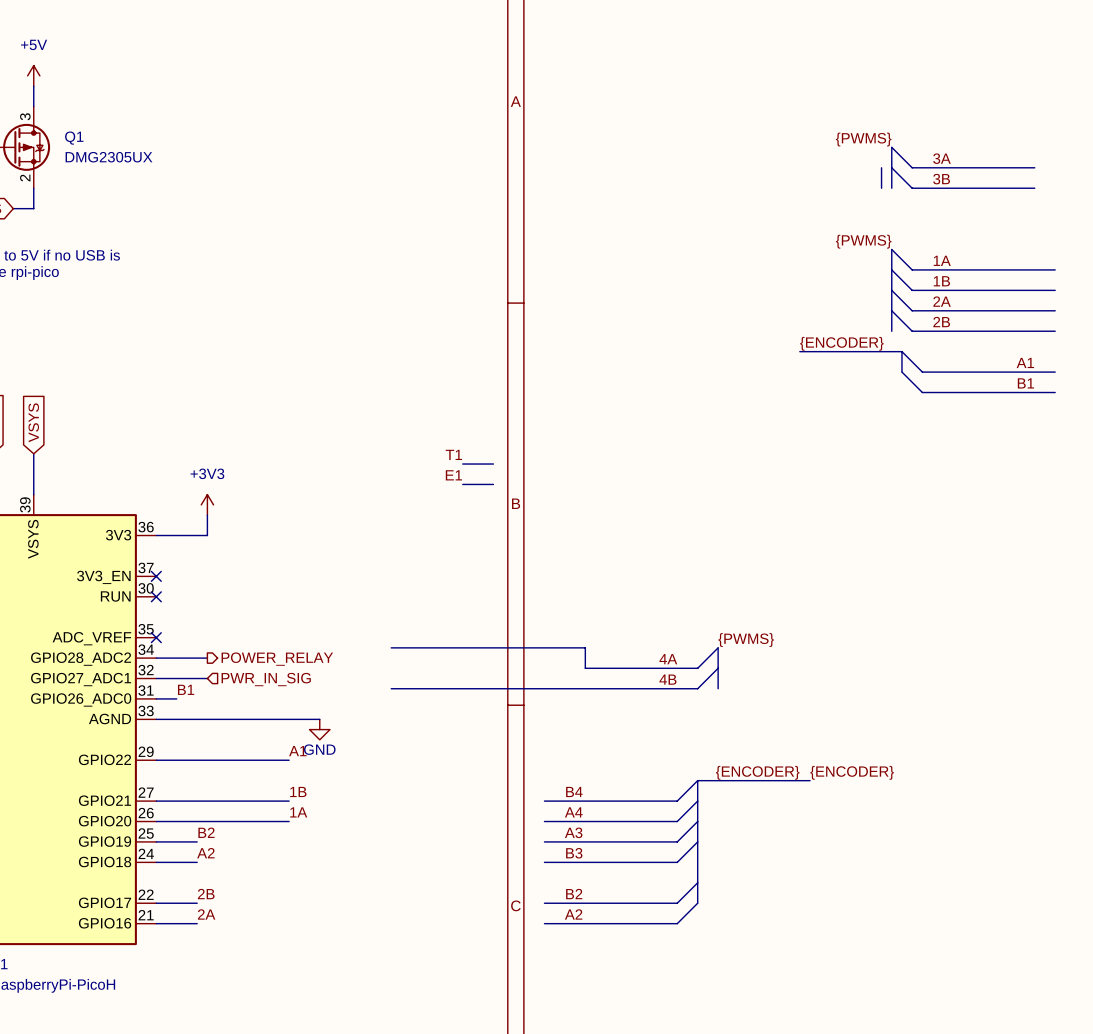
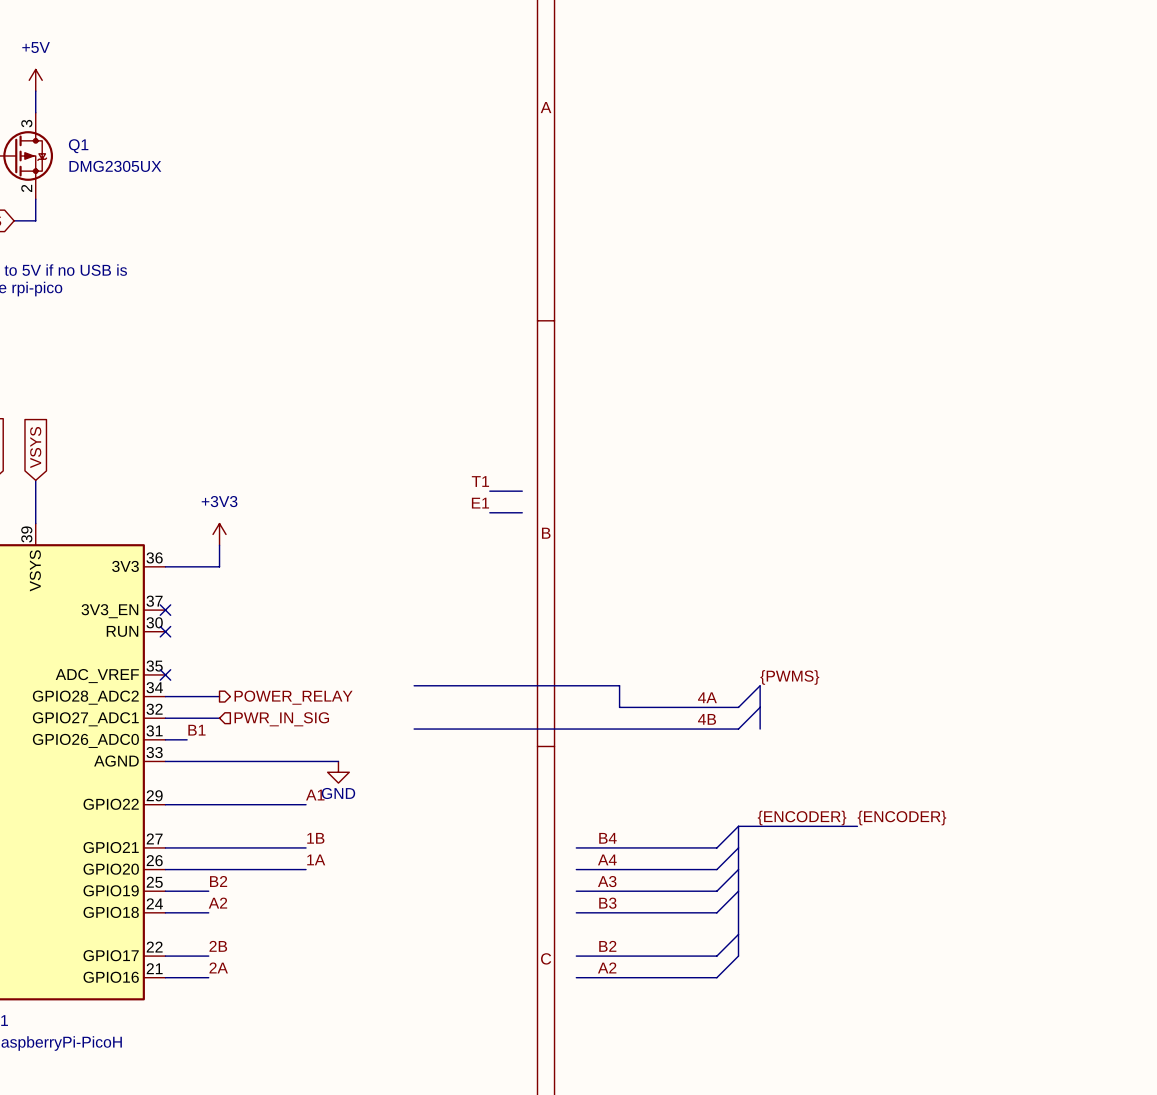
label: {PWMS} (863, 139) -> none
wire: (891, 147) (912, 167) (1034, 167) -> none
bus: (891, 147) (891, 188) -> none
label: 3A (941, 158) -> none
bus: (881, 167) (881, 188) -> none
wire: (891, 167) (912, 188) (1034, 188) -> none
label: 3B (941, 179) -> none
label: {PWMS} (863, 241) -> none
wire: (891, 249) (912, 269) (1055, 269) -> none
bus: (891, 249) (891, 331) -> none
label: 1A (942, 260) -> none
wire: (891, 269) (912, 290) (1055, 290) -> none
label: 1B (941, 281) -> none
wire: (891, 290) (912, 310) (1055, 310) -> none
label: 2A (942, 301) -> none
wire: (891, 310) (912, 331) (1055, 331) -> none
label: 2B (941, 322) -> none
label: {ENCODER} (841, 343) -> none
bus: (799, 351) (901, 351) (901, 372) -> none
wire: (901, 351) (922, 372) (1055, 372) -> none
label: A1 (1025, 362) -> none
wire: (901, 372) (922, 392) (1055, 392) -> none
label: B1 (1025, 383) -> none

